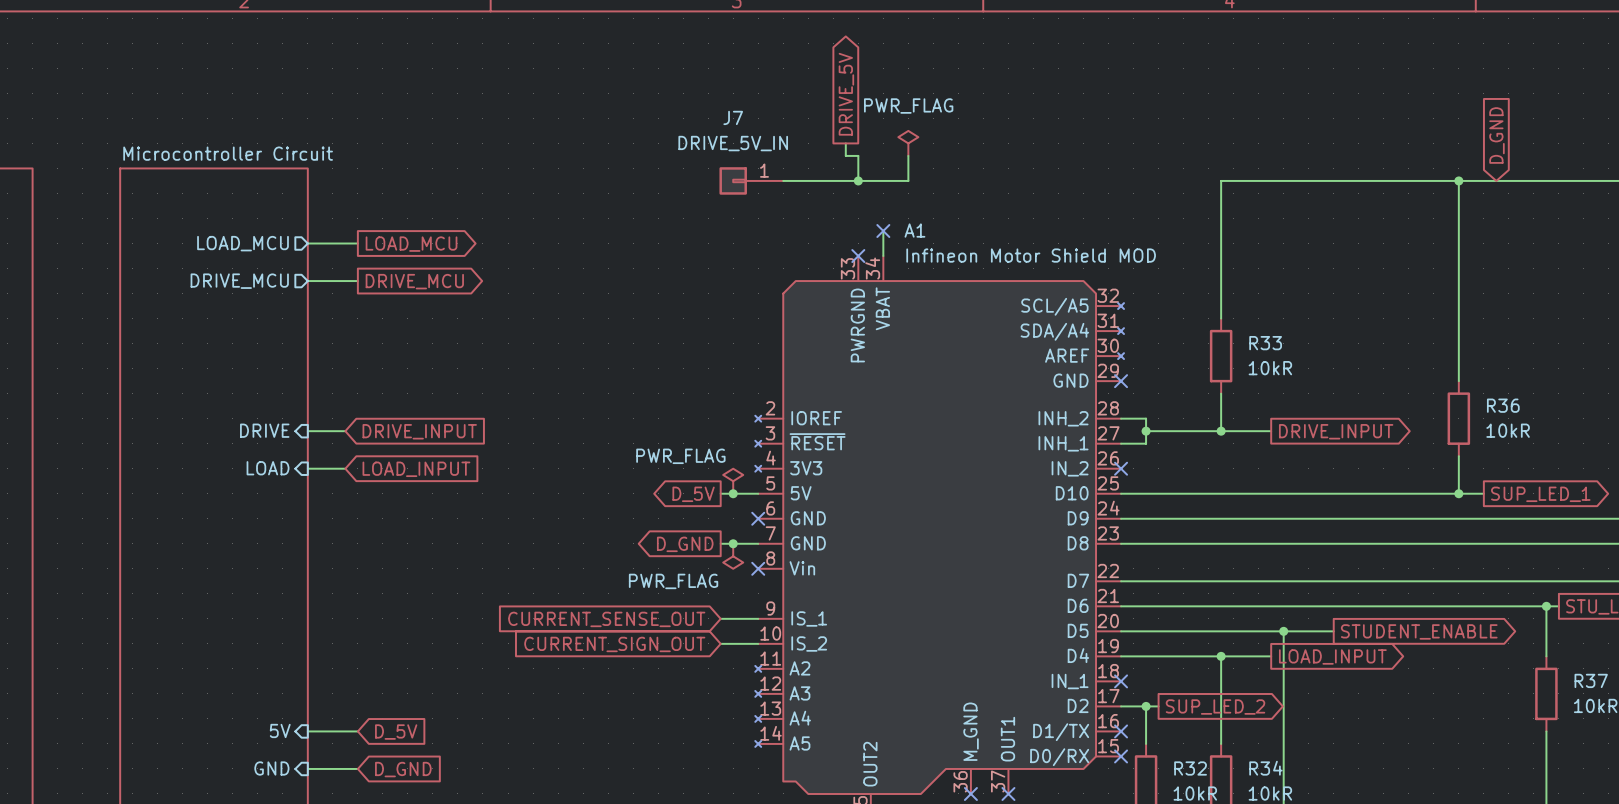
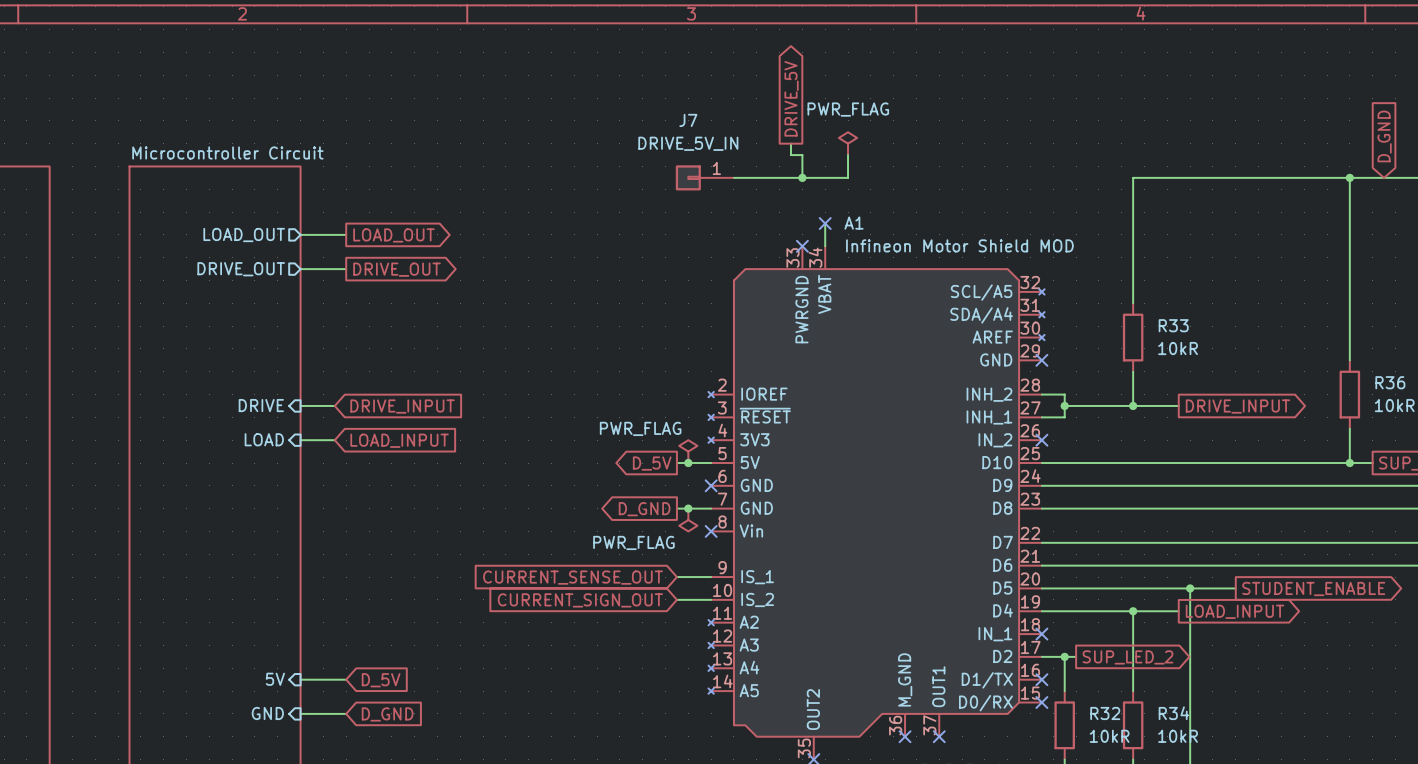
sheet pin: LOAD_MCU (243, 243) -> LOAD_OUT (244, 235)
global label: LOAD_MCU (411, 244) -> LOAD_OUT (394, 235)
sheet pin: DRIVE_MCU (239, 281) -> DRIVE_OUT (241, 269)
global label: DRIVE_MCU (414, 281) -> DRIVE_OUT (396, 269)

